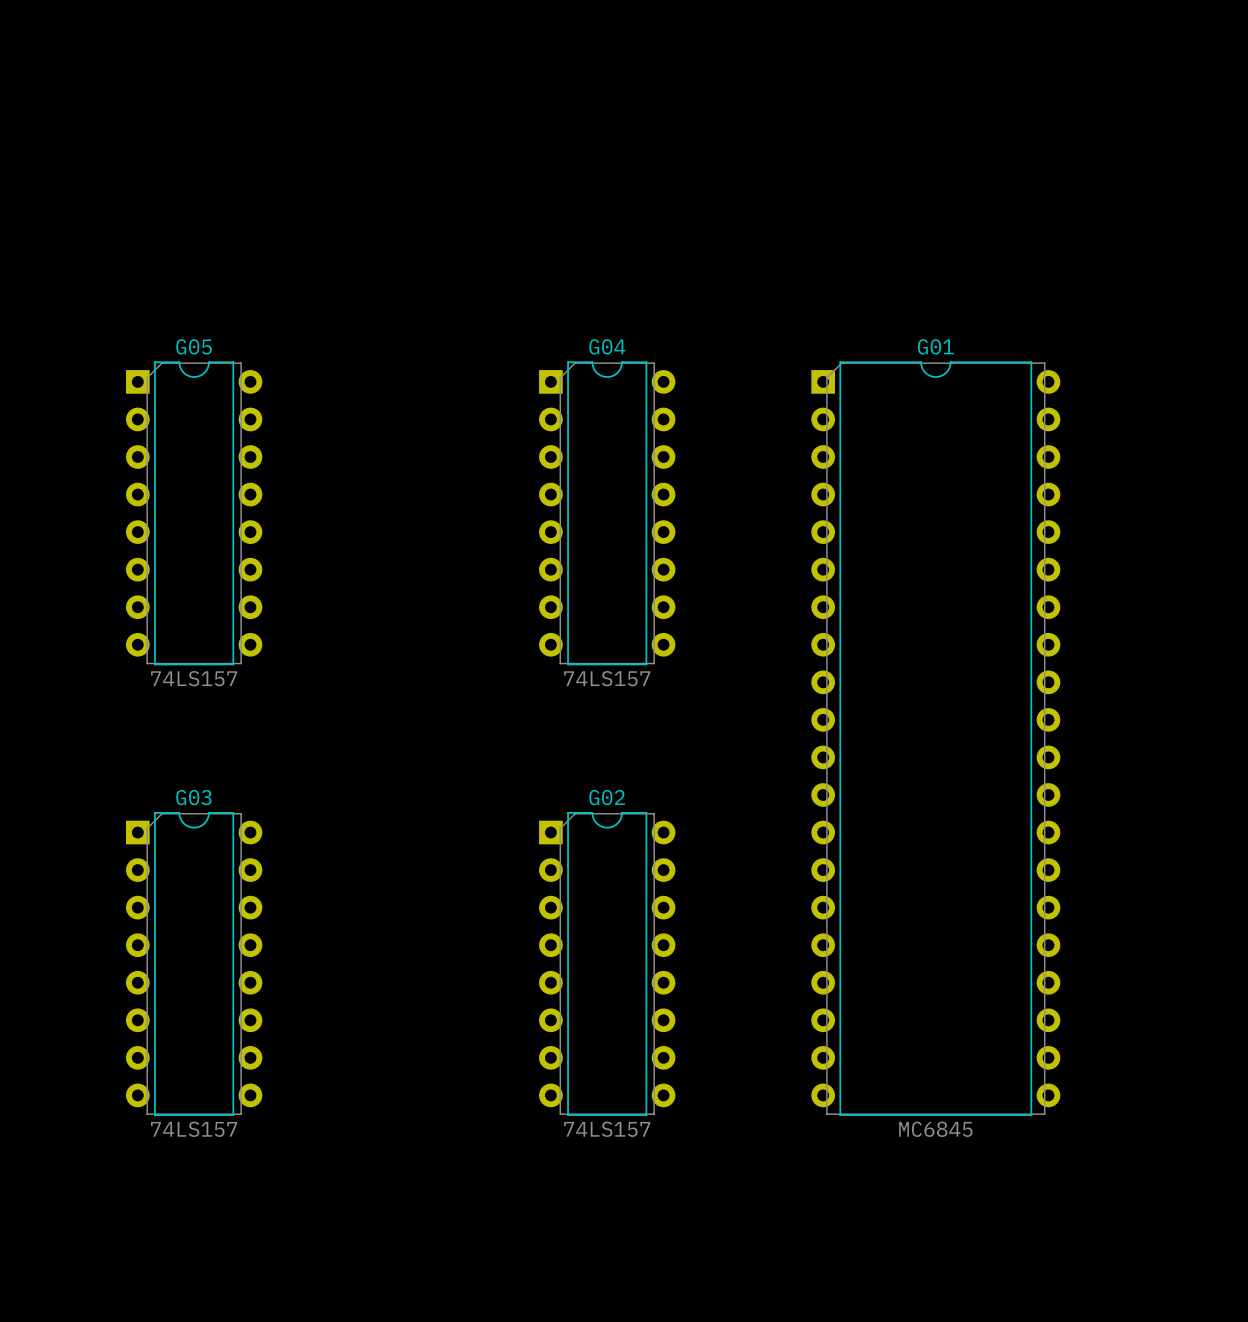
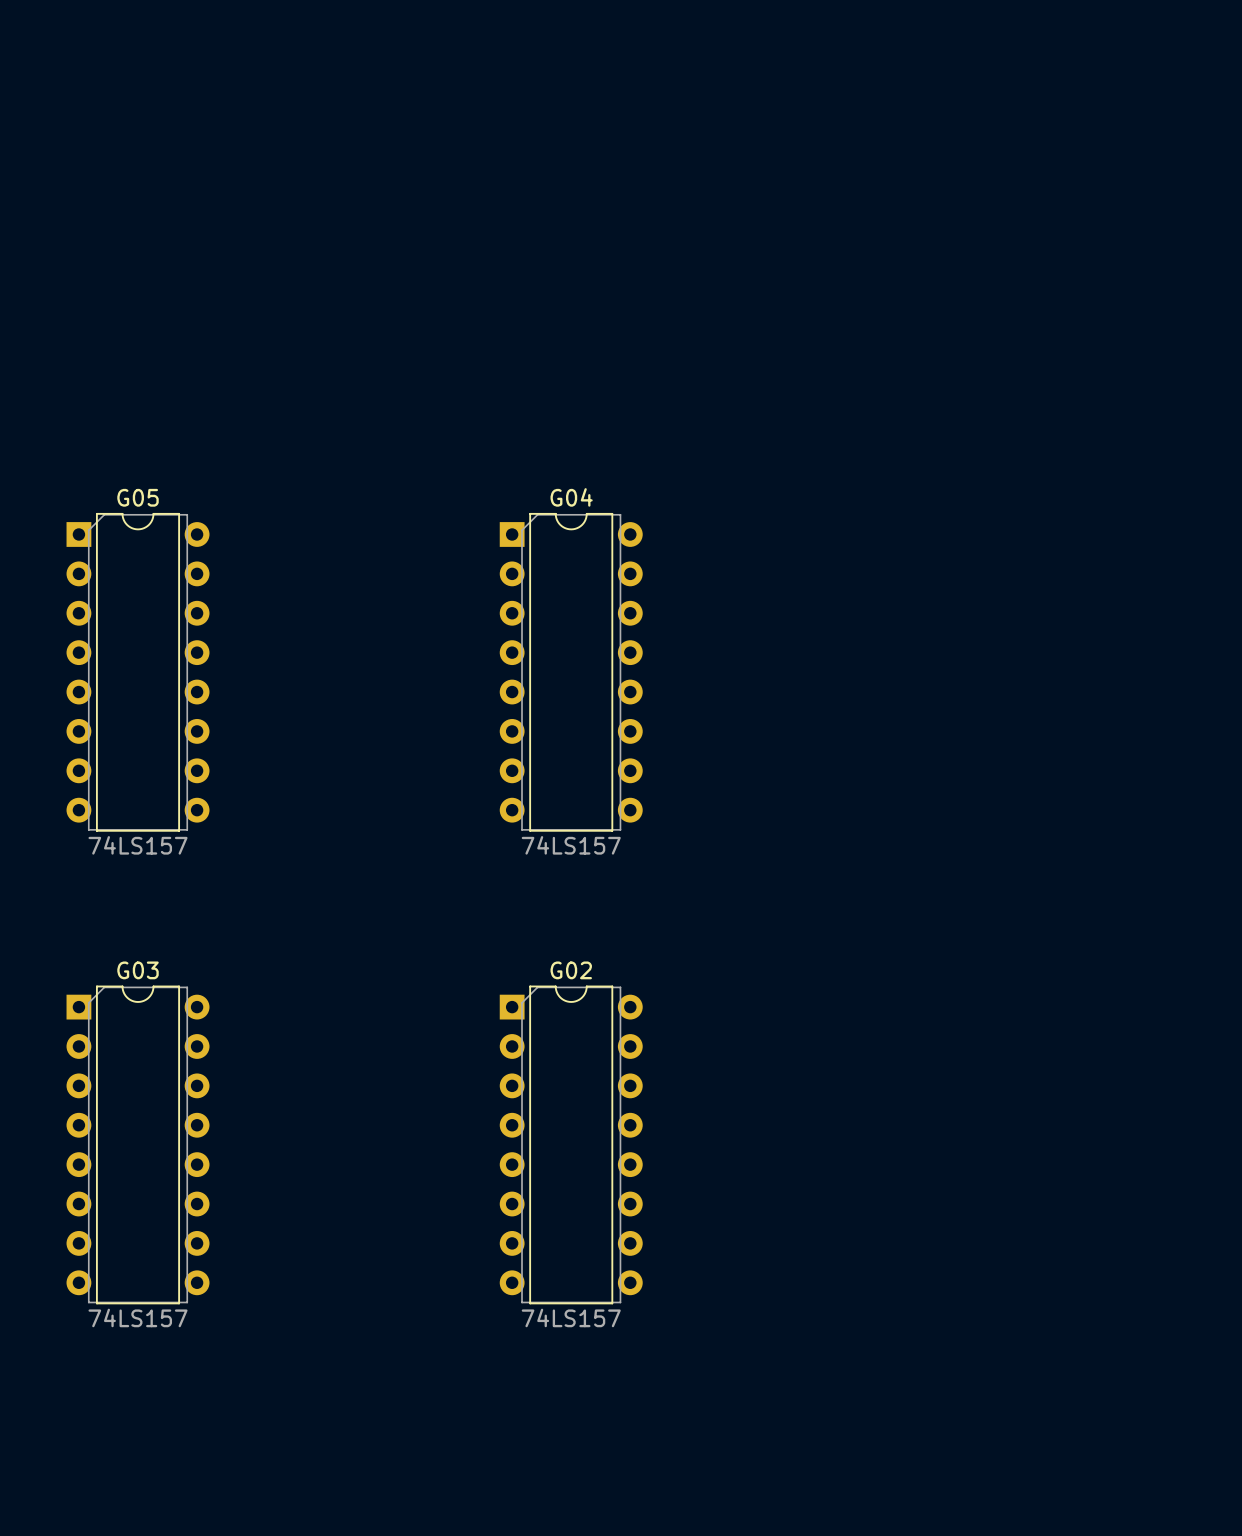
G01: MC6845 (935, 738) -> none

